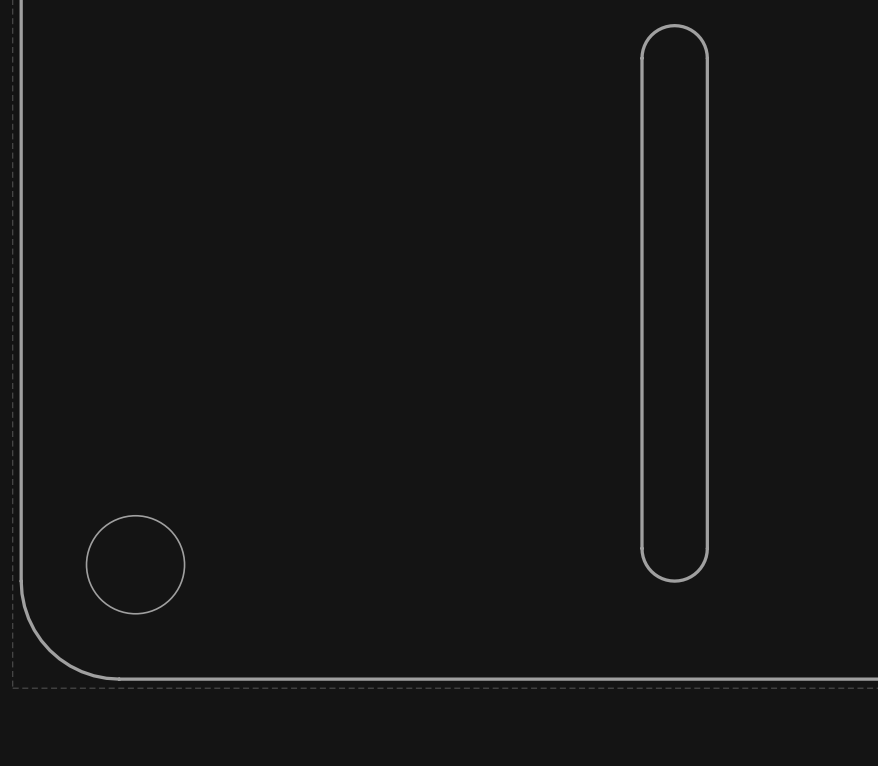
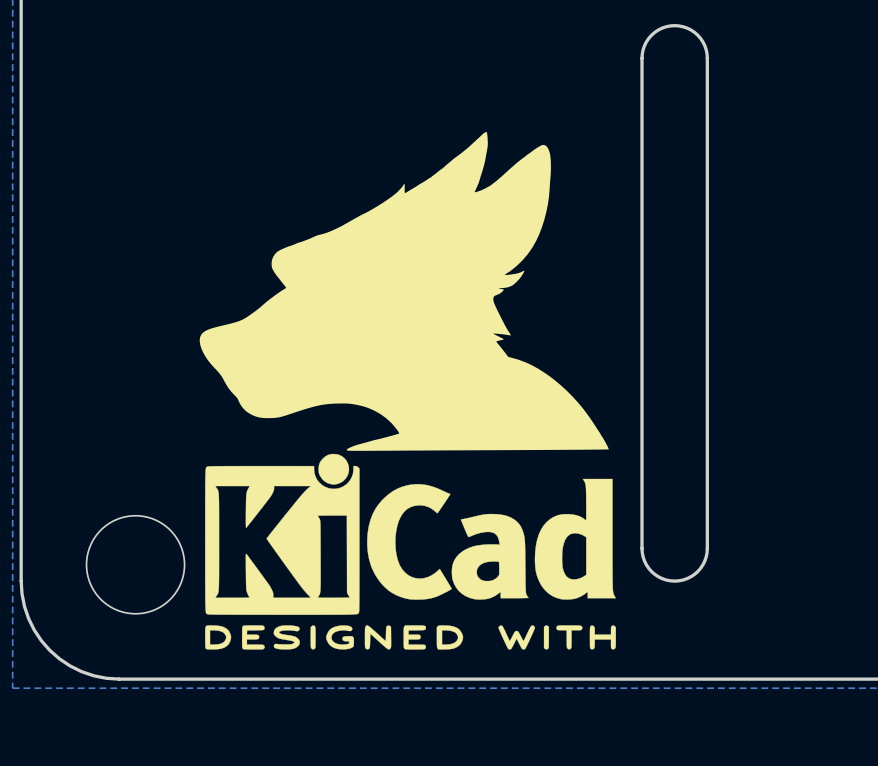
drawing: none -> [199, 132, 616, 650]

